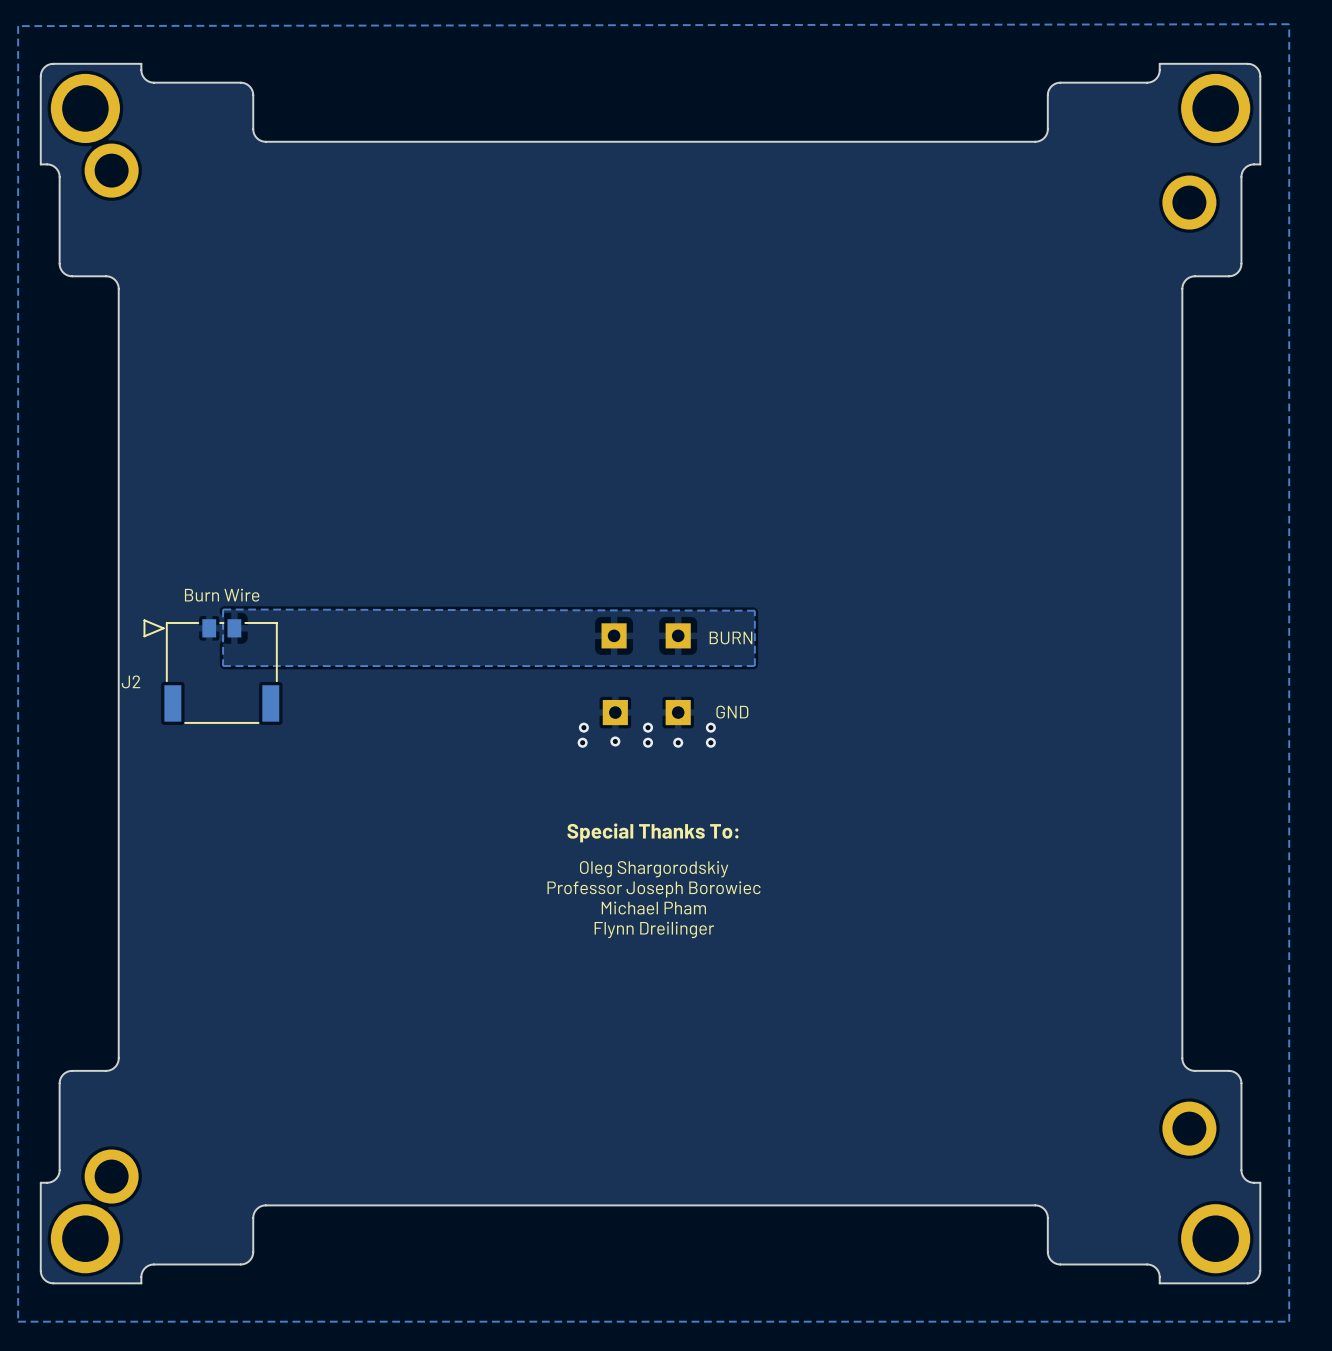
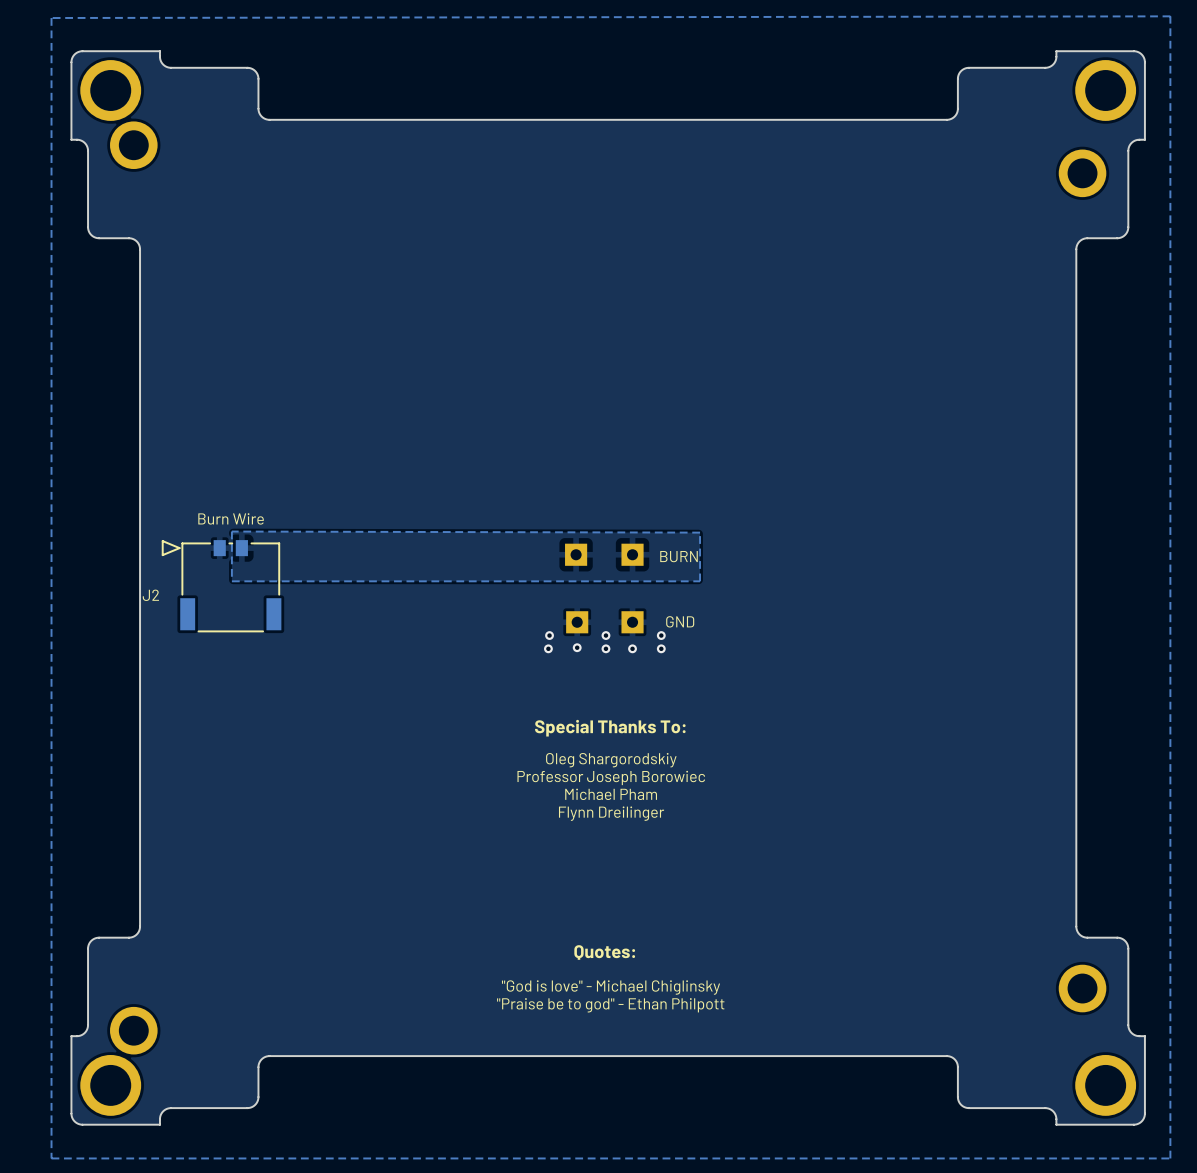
text: none -> Quotes: (604, 952)
text: none -> "God is love" - Michael Chiglinsky (611, 987)
text: none -> "Praise be to god" - Ethan Philpott (610, 1005)

